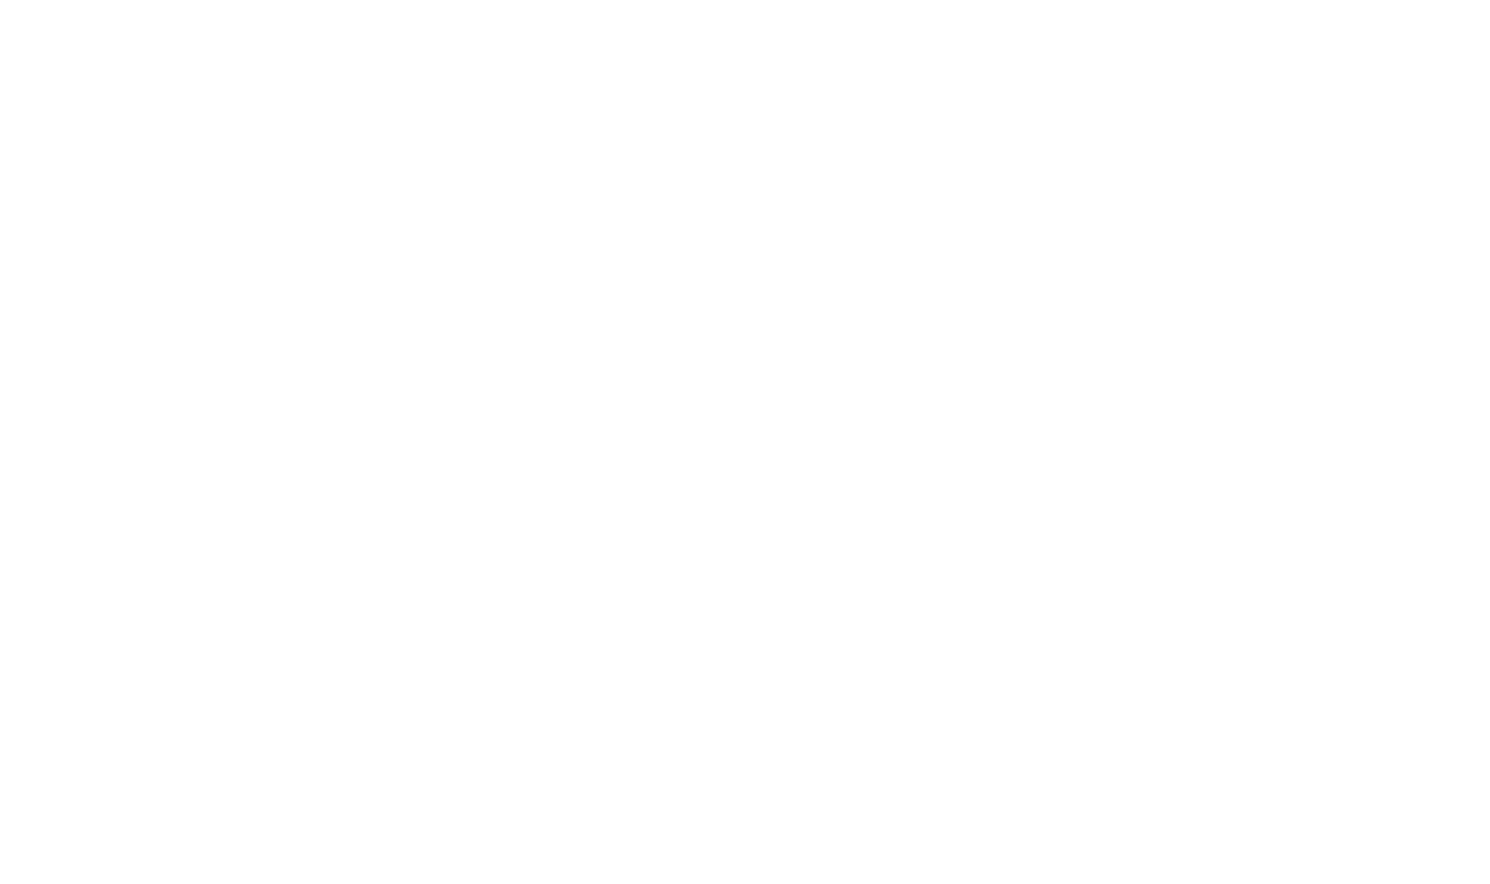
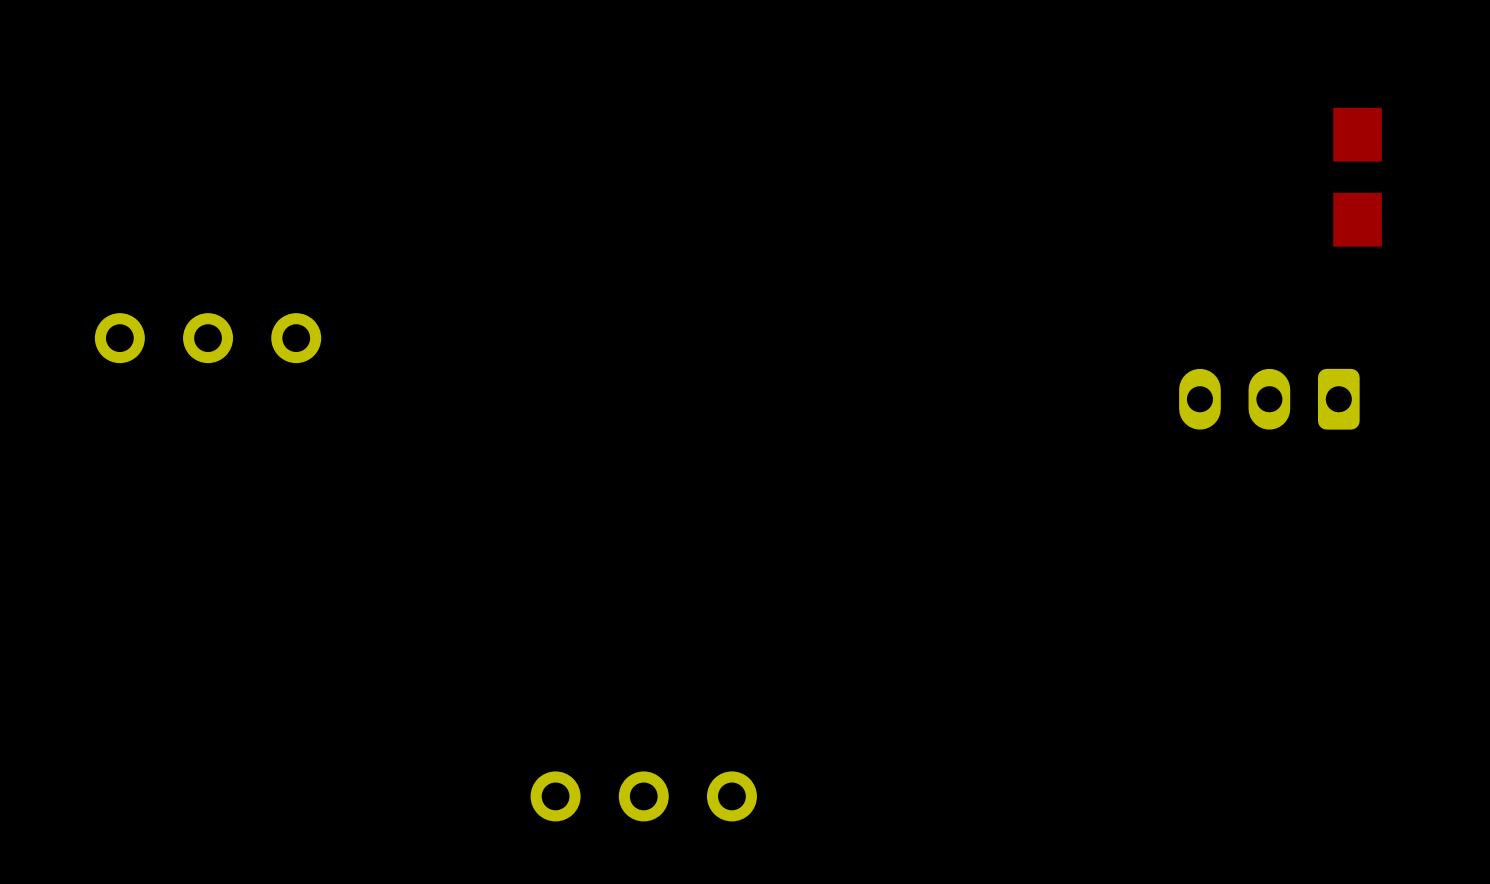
part: none -> (1357, 177)
part: none -> (208, 338)
part: none -> (1269, 399)
part: none -> (643, 796)

